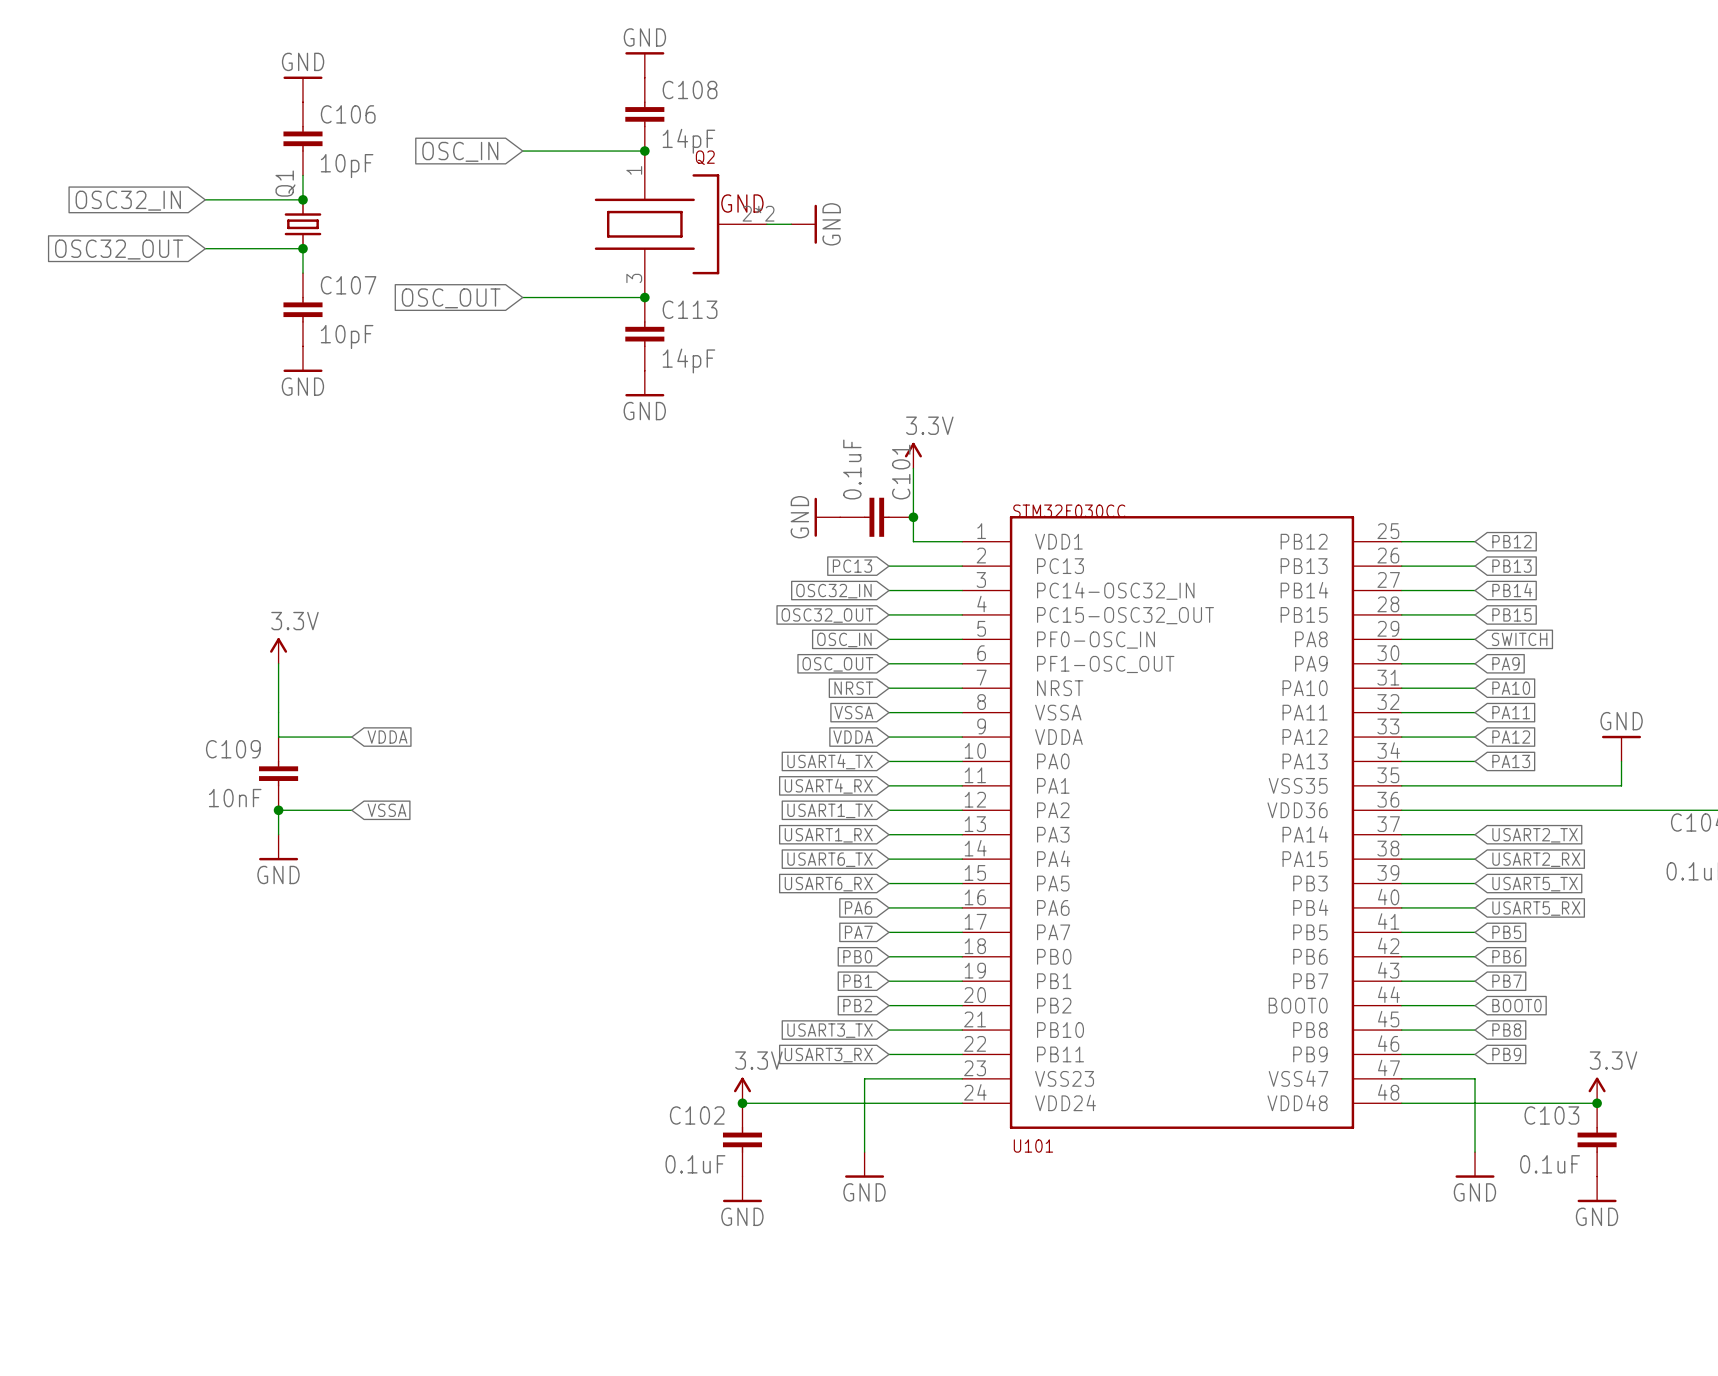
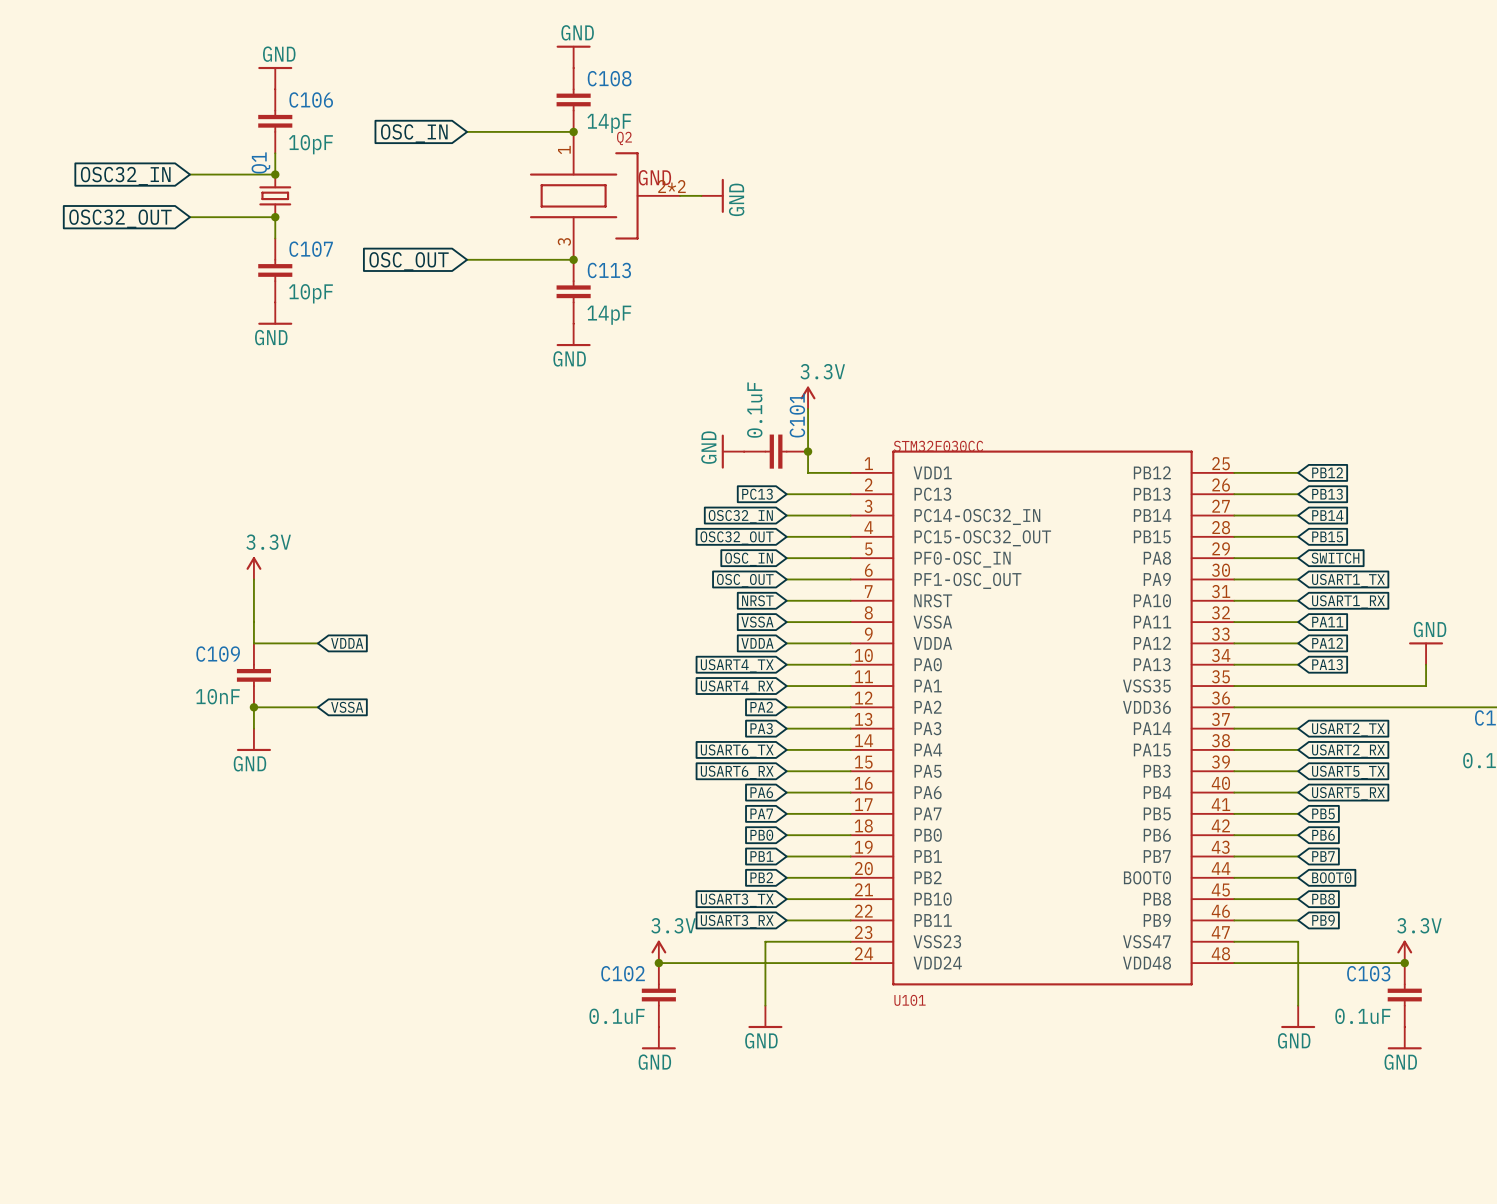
global label: PA9 (1505, 663) -> USART1_TX (1348, 580)
global label: PA10 (1511, 688) -> USART1_RX (1348, 601)
global label: USART1_TX (830, 810) -> PA2 (761, 707)
global label: USART1_RX (828, 835) -> PA3 (761, 728)

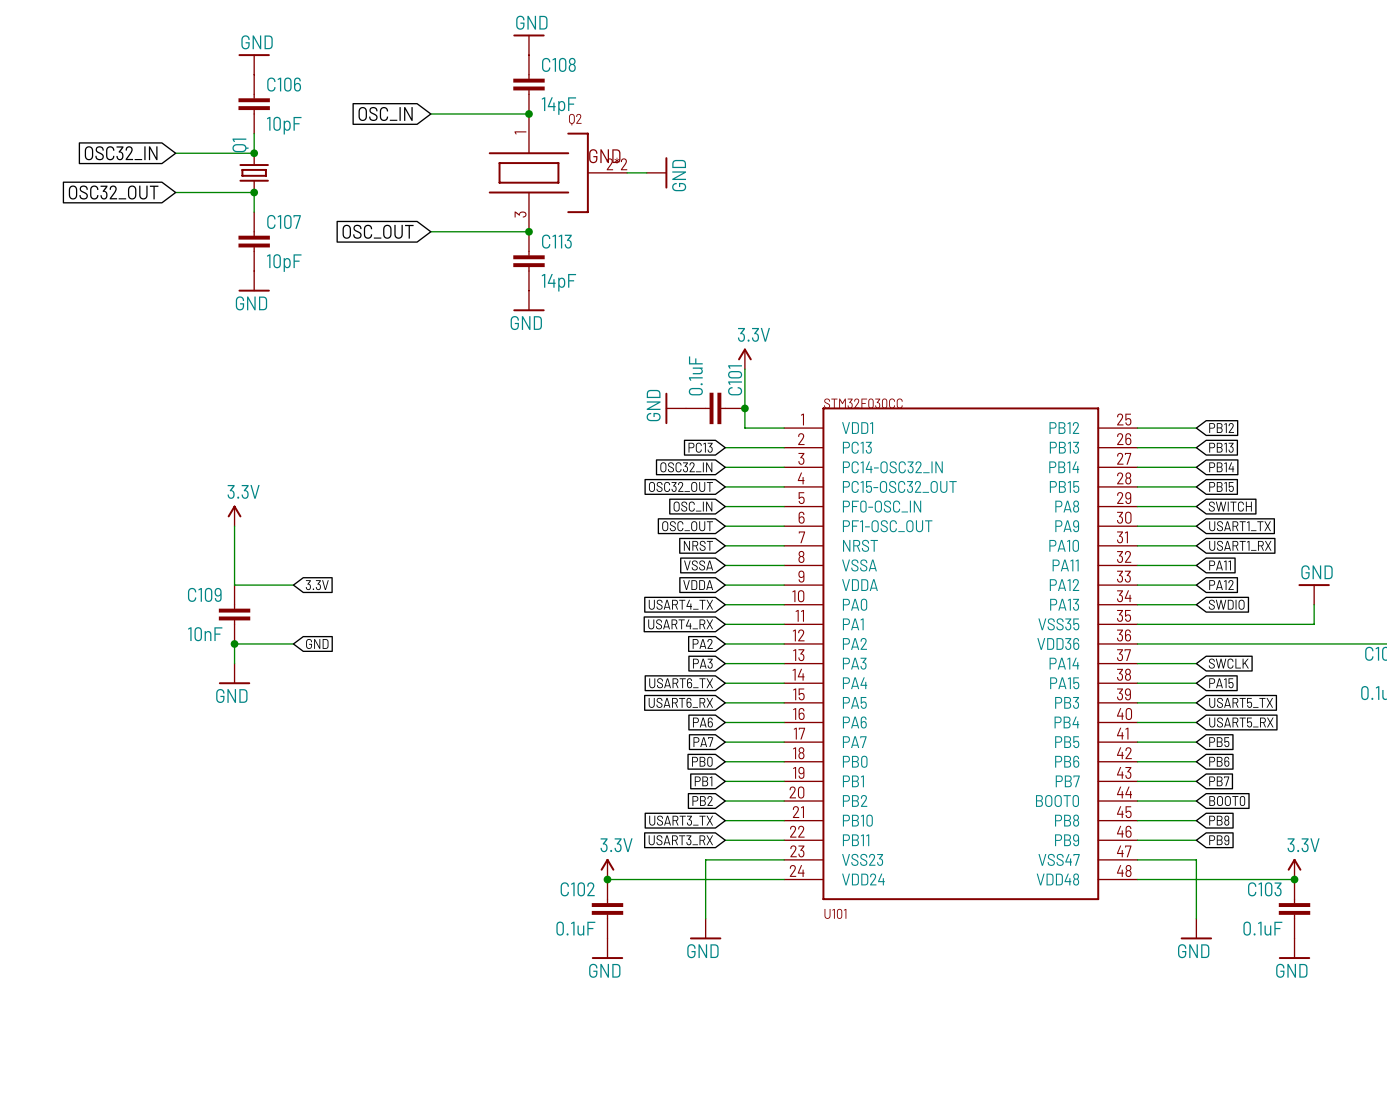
global label: VDDA (347, 643) -> 3.3V (317, 585)
global label: PA13 (1327, 664) -> SWDIO (1226, 604)
global label: VSSA (347, 707) -> GND (317, 643)
global label: USART2_TX (1348, 729) -> SWCLK (1228, 663)
global label: USART2_RX (1348, 751) -> PA15 (1221, 683)

